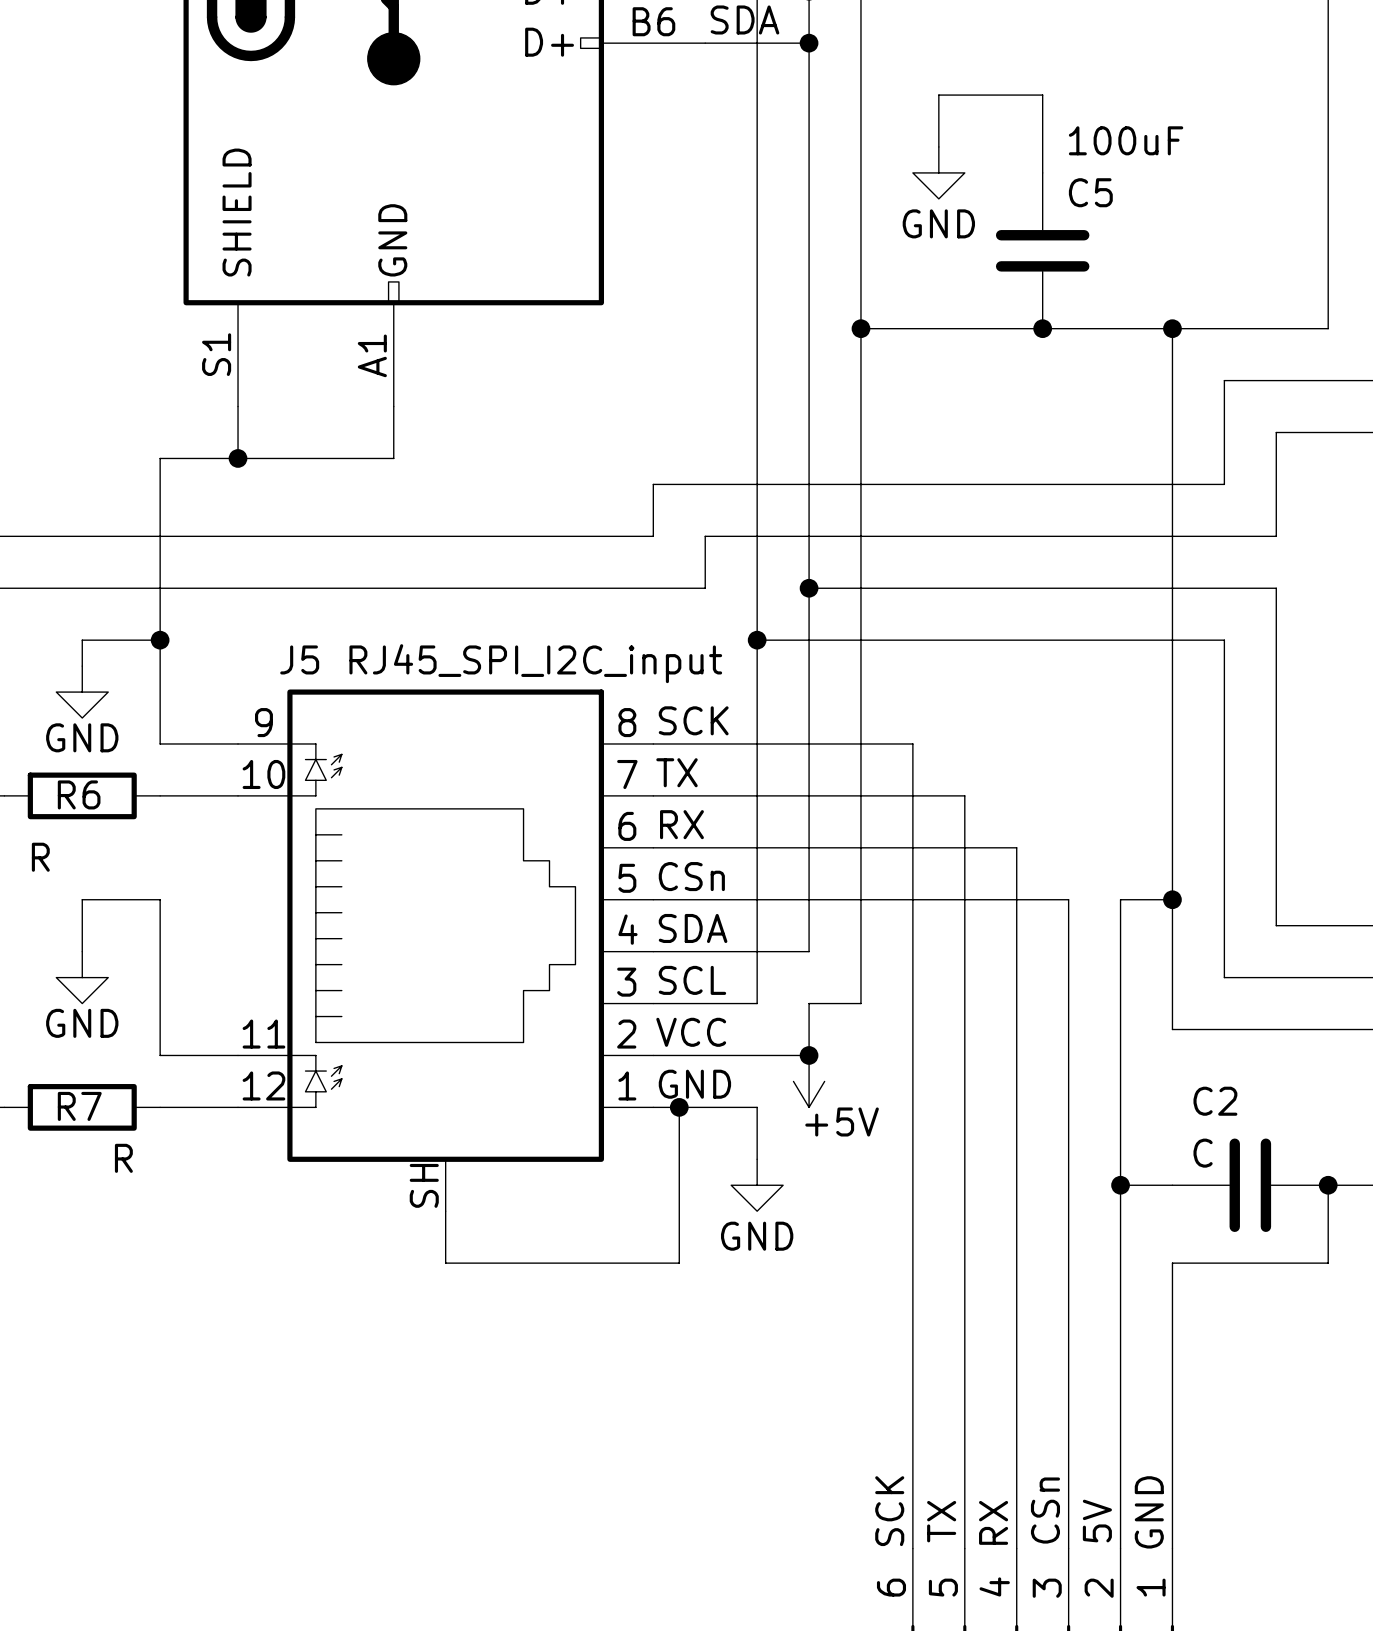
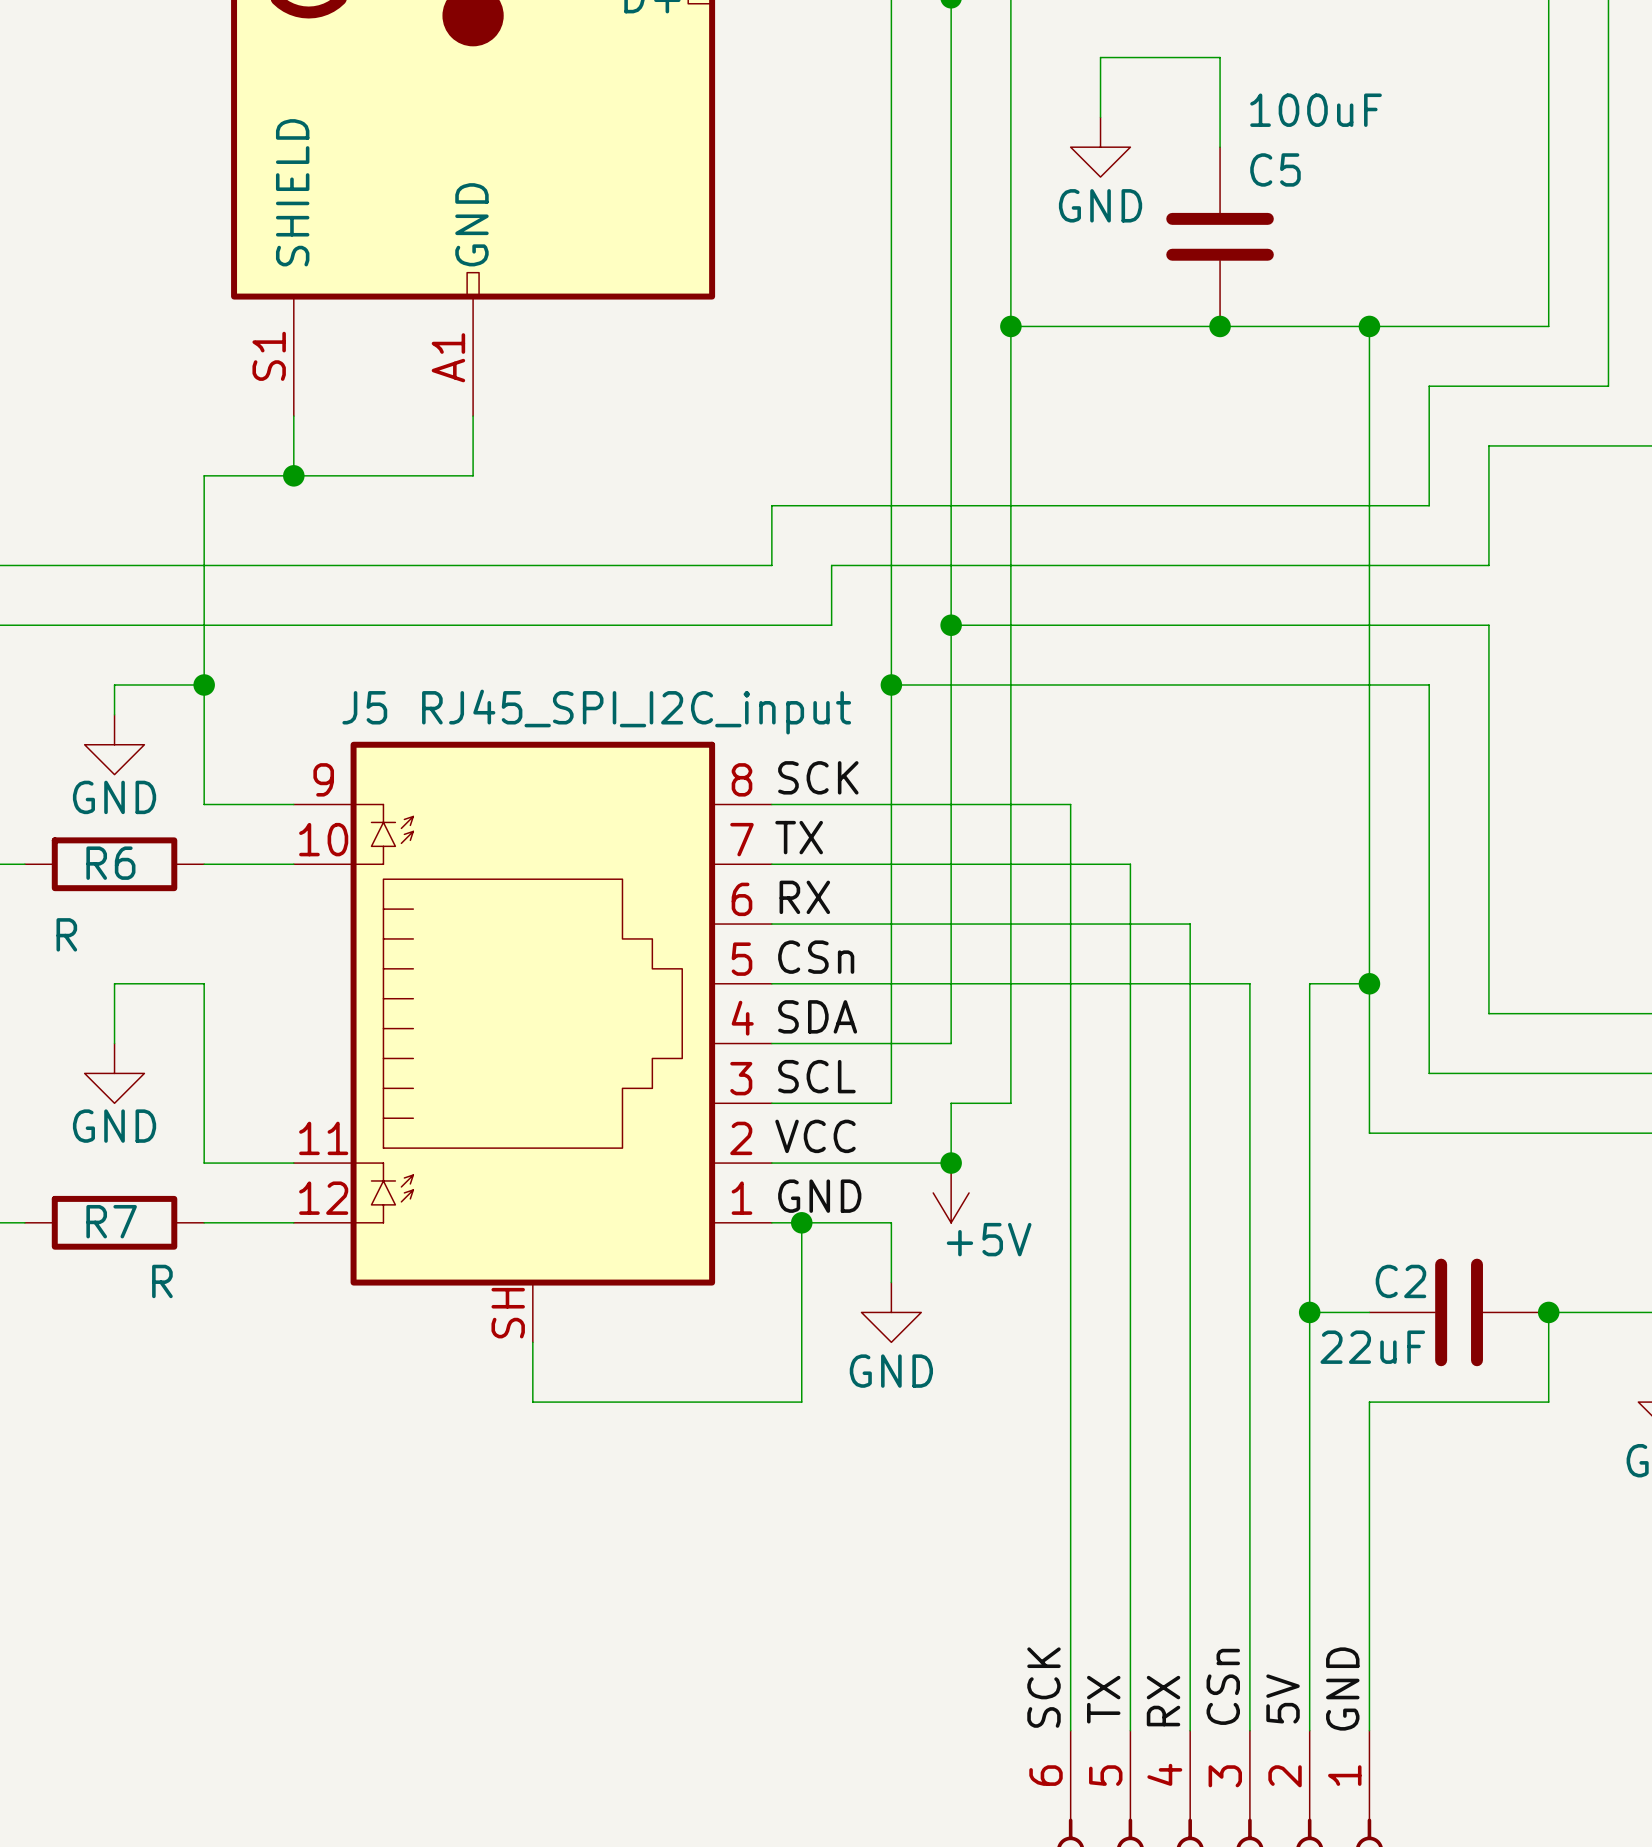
C2 name position: C2 (1215, 1101) -> C2 (1400, 1281)
C2 value: C (1203, 1153) -> 22uF (1372, 1347)

